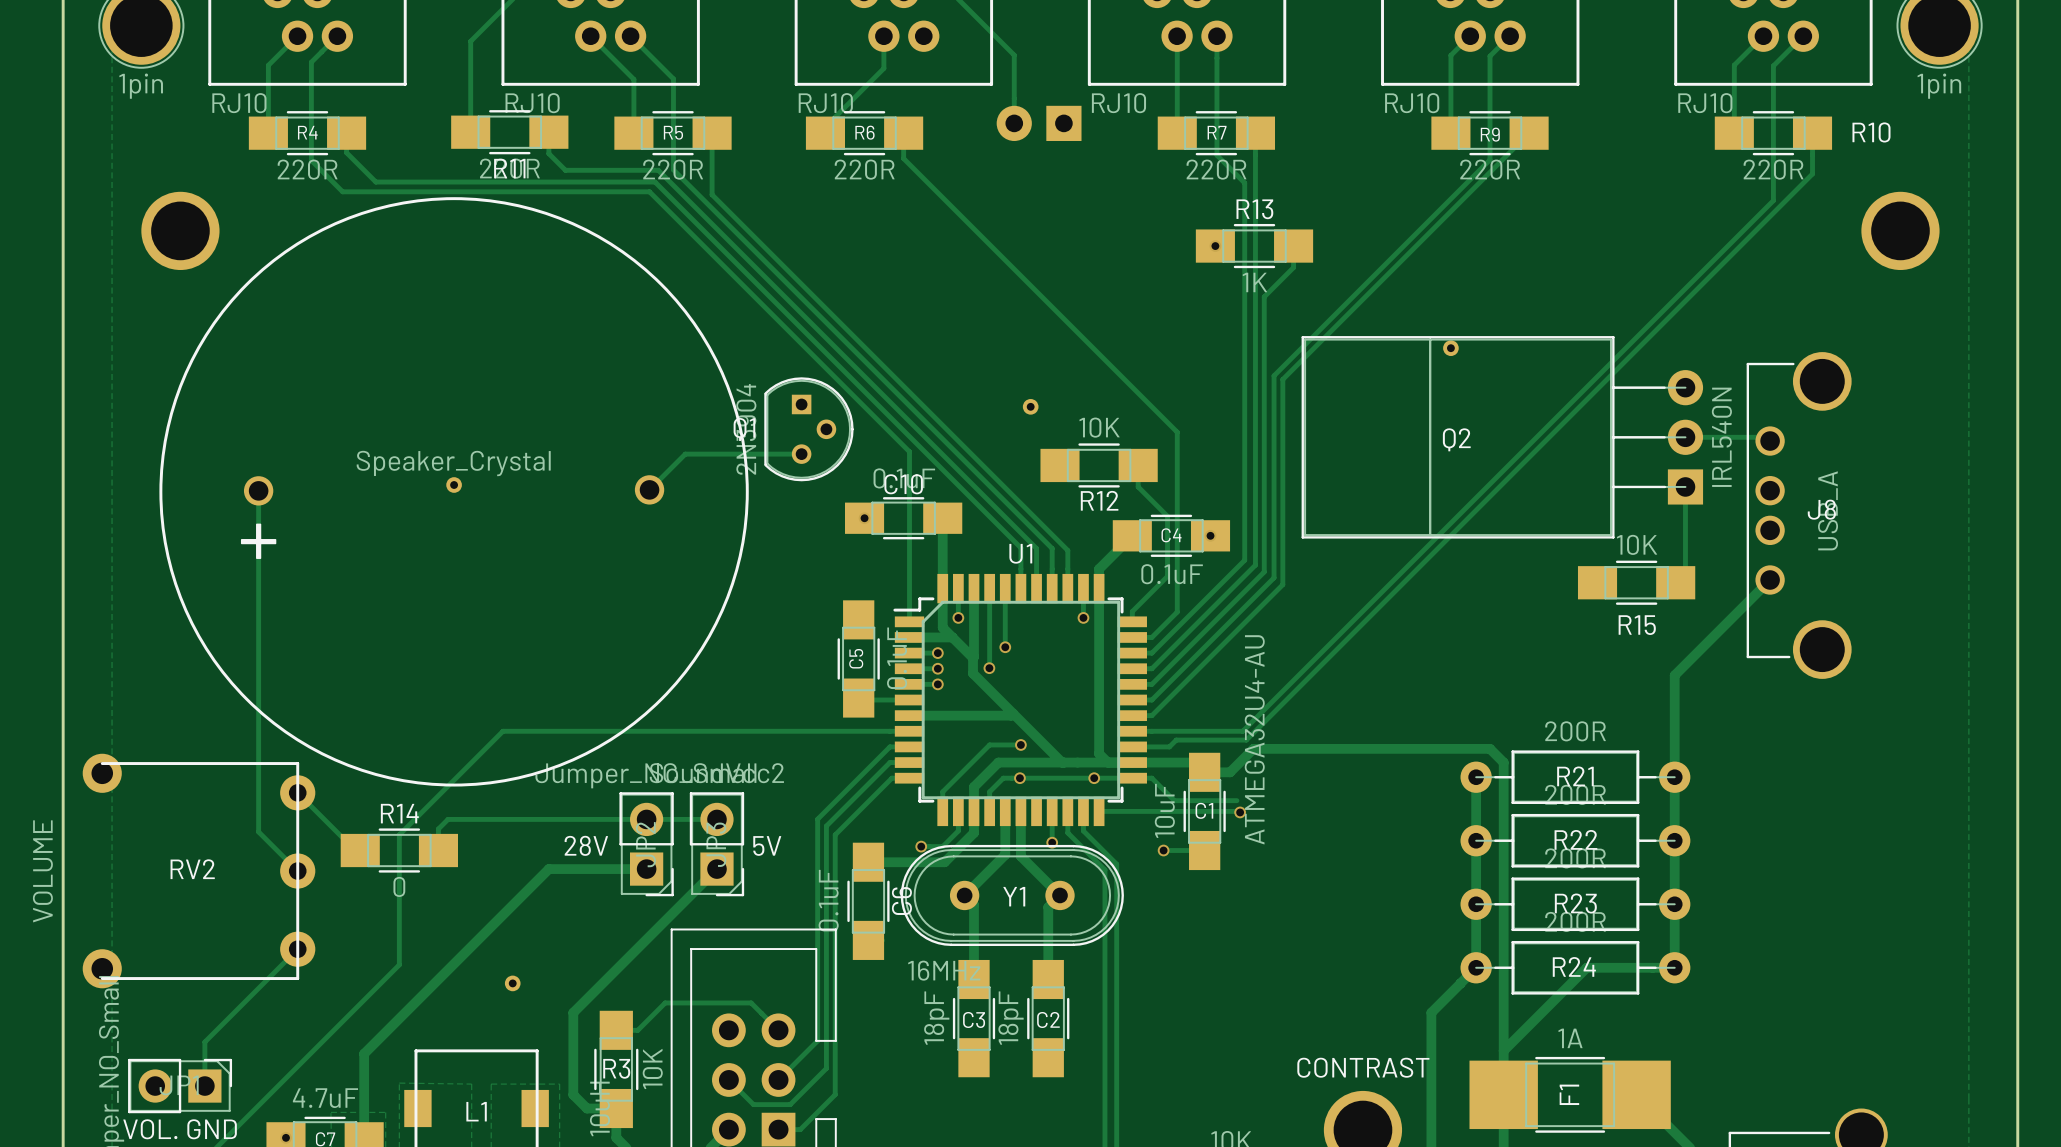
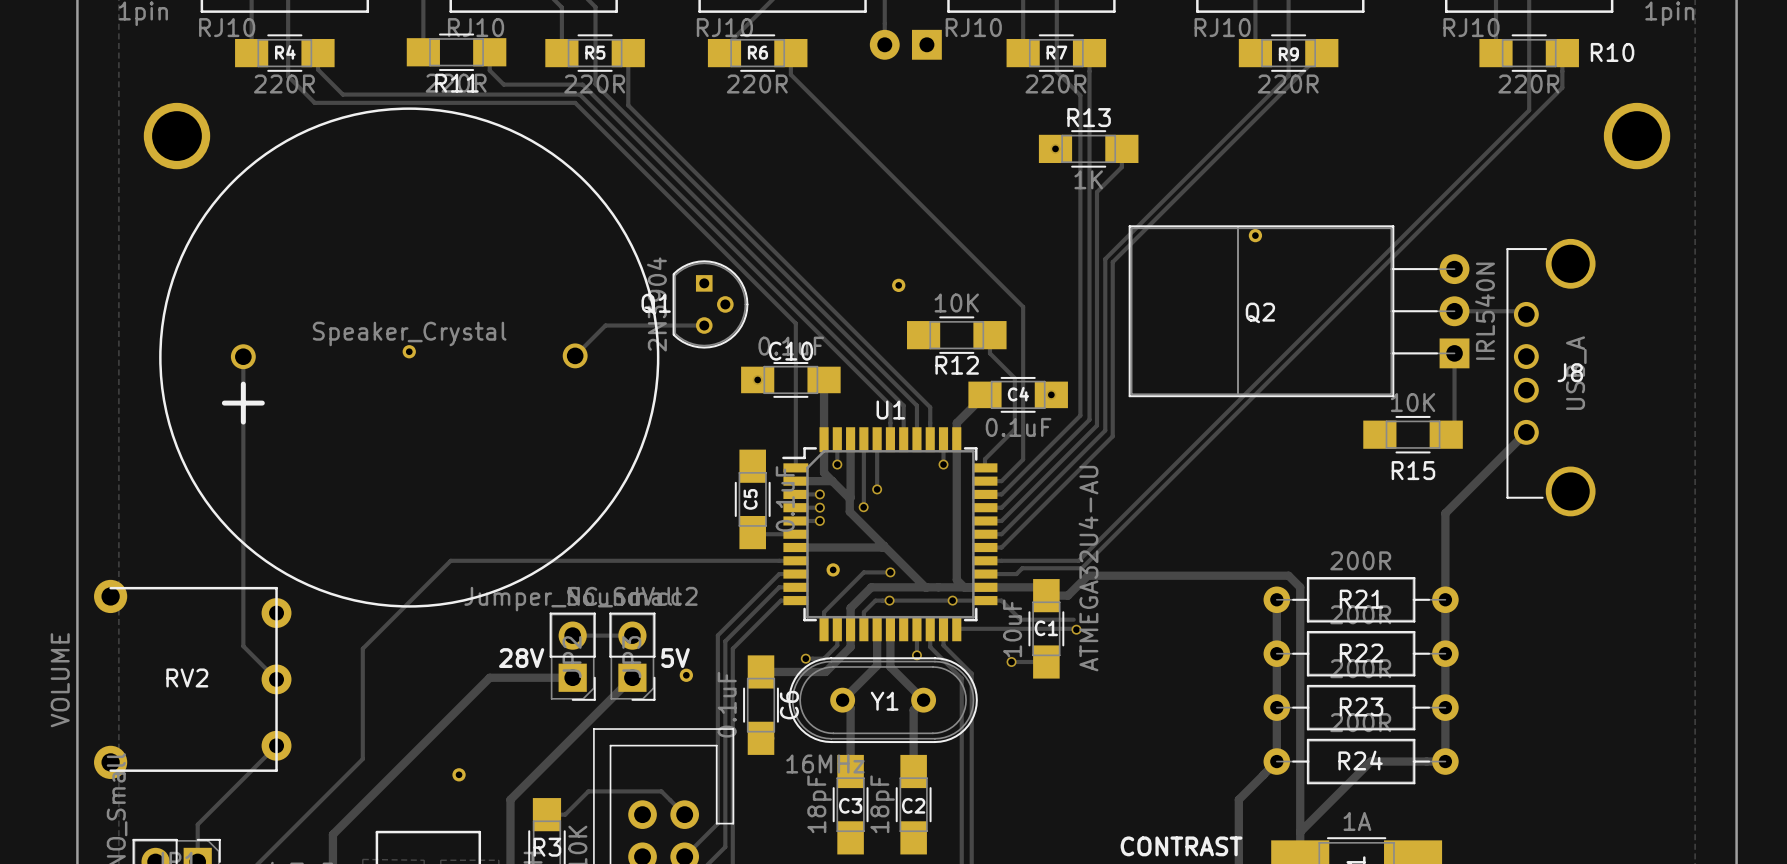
part: none -> (833, 569)
track: (297, 792) (355, 850) (360, 850) -> none
track: (646, 819) (448, 819) (438, 829) (438, 850) -> none
R14: 0 (399, 850) -> none
part: none -> (686, 675)

